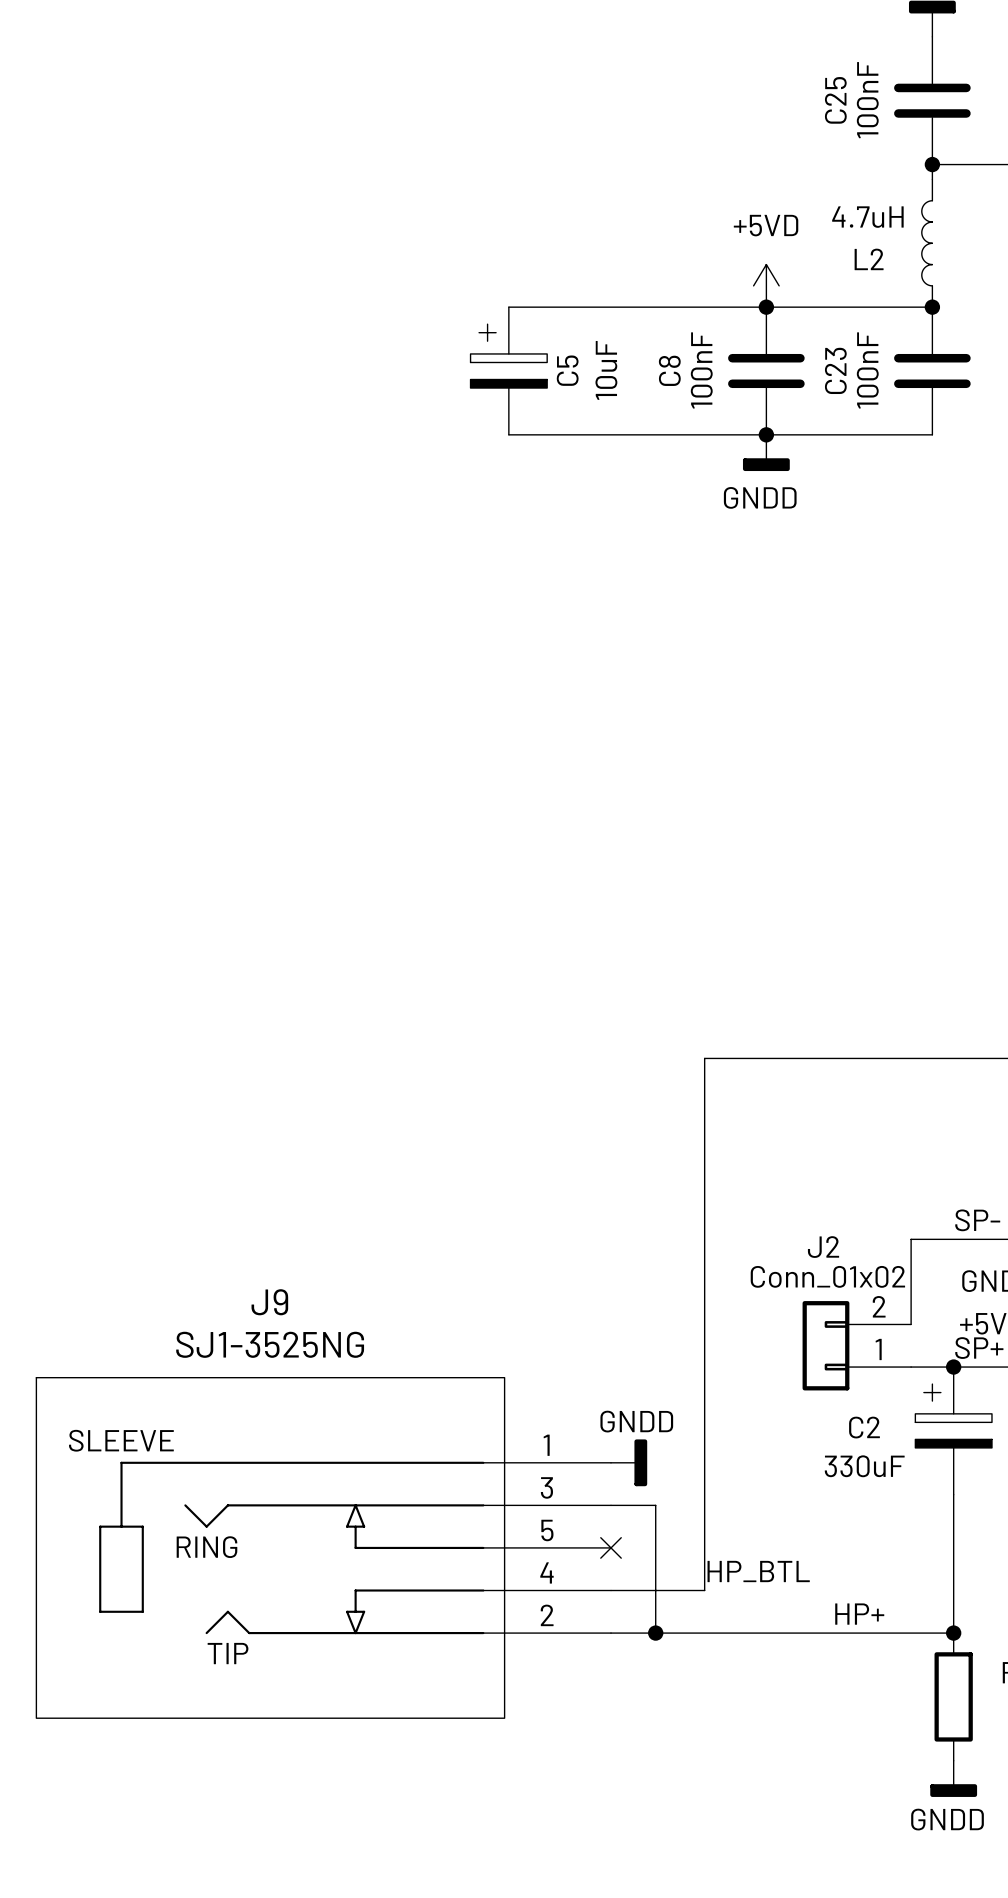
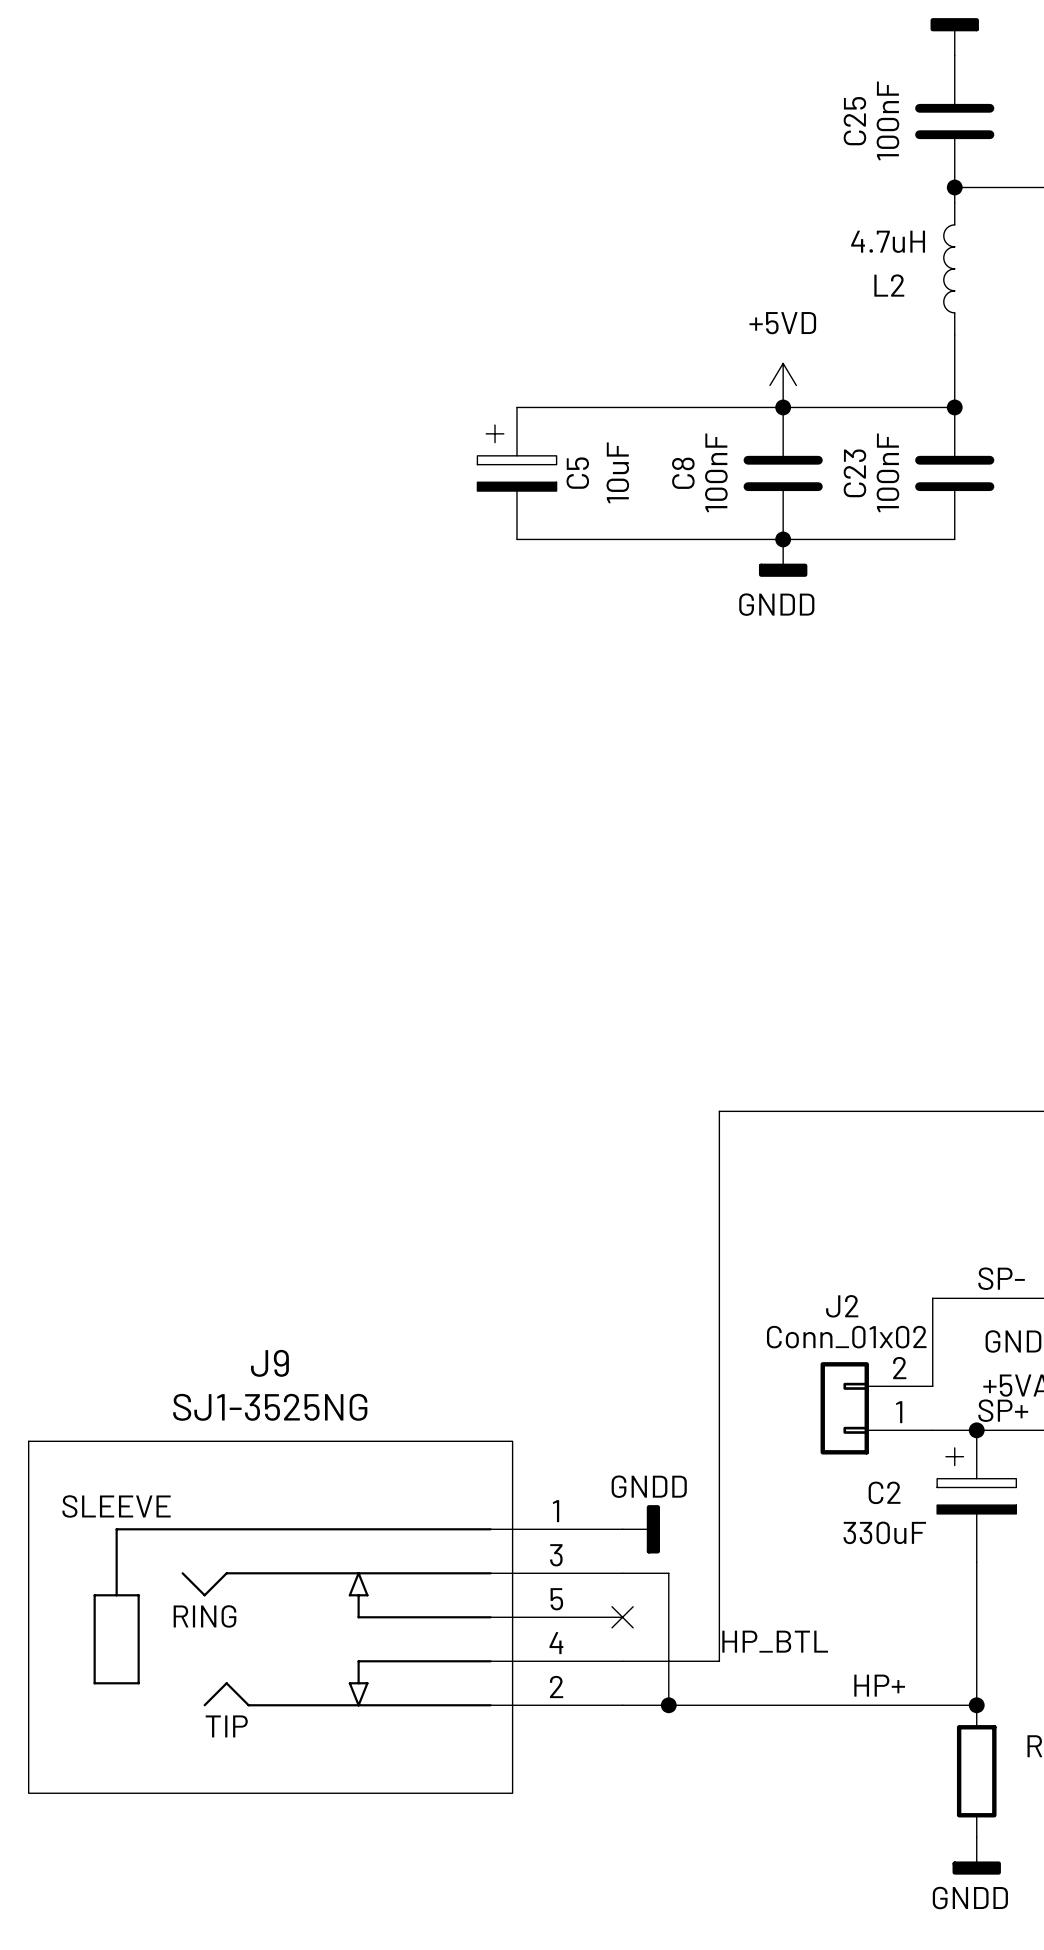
power symbol position: +5VD (766, 285) -> +5VD (783, 385)
wire: (508, 307) (932, 307) -> (517, 407) (954, 407) (954, 334)
junction: (766, 307) -> none
junction position: (932, 307) -> (954, 407)
C5 position: (508, 371) -> (517, 473)
C8 position: (766, 371) -> (783, 473)
C23 position: (932, 371) -> (954, 473)
junction: none -> (783, 407)
wire: (508, 434) (932, 434) -> (517, 539) (954, 539)
junction: (766, 434) -> none
power symbol position: GNDD (766, 452) -> GNDD (783, 558)
junction: none -> (783, 539)

